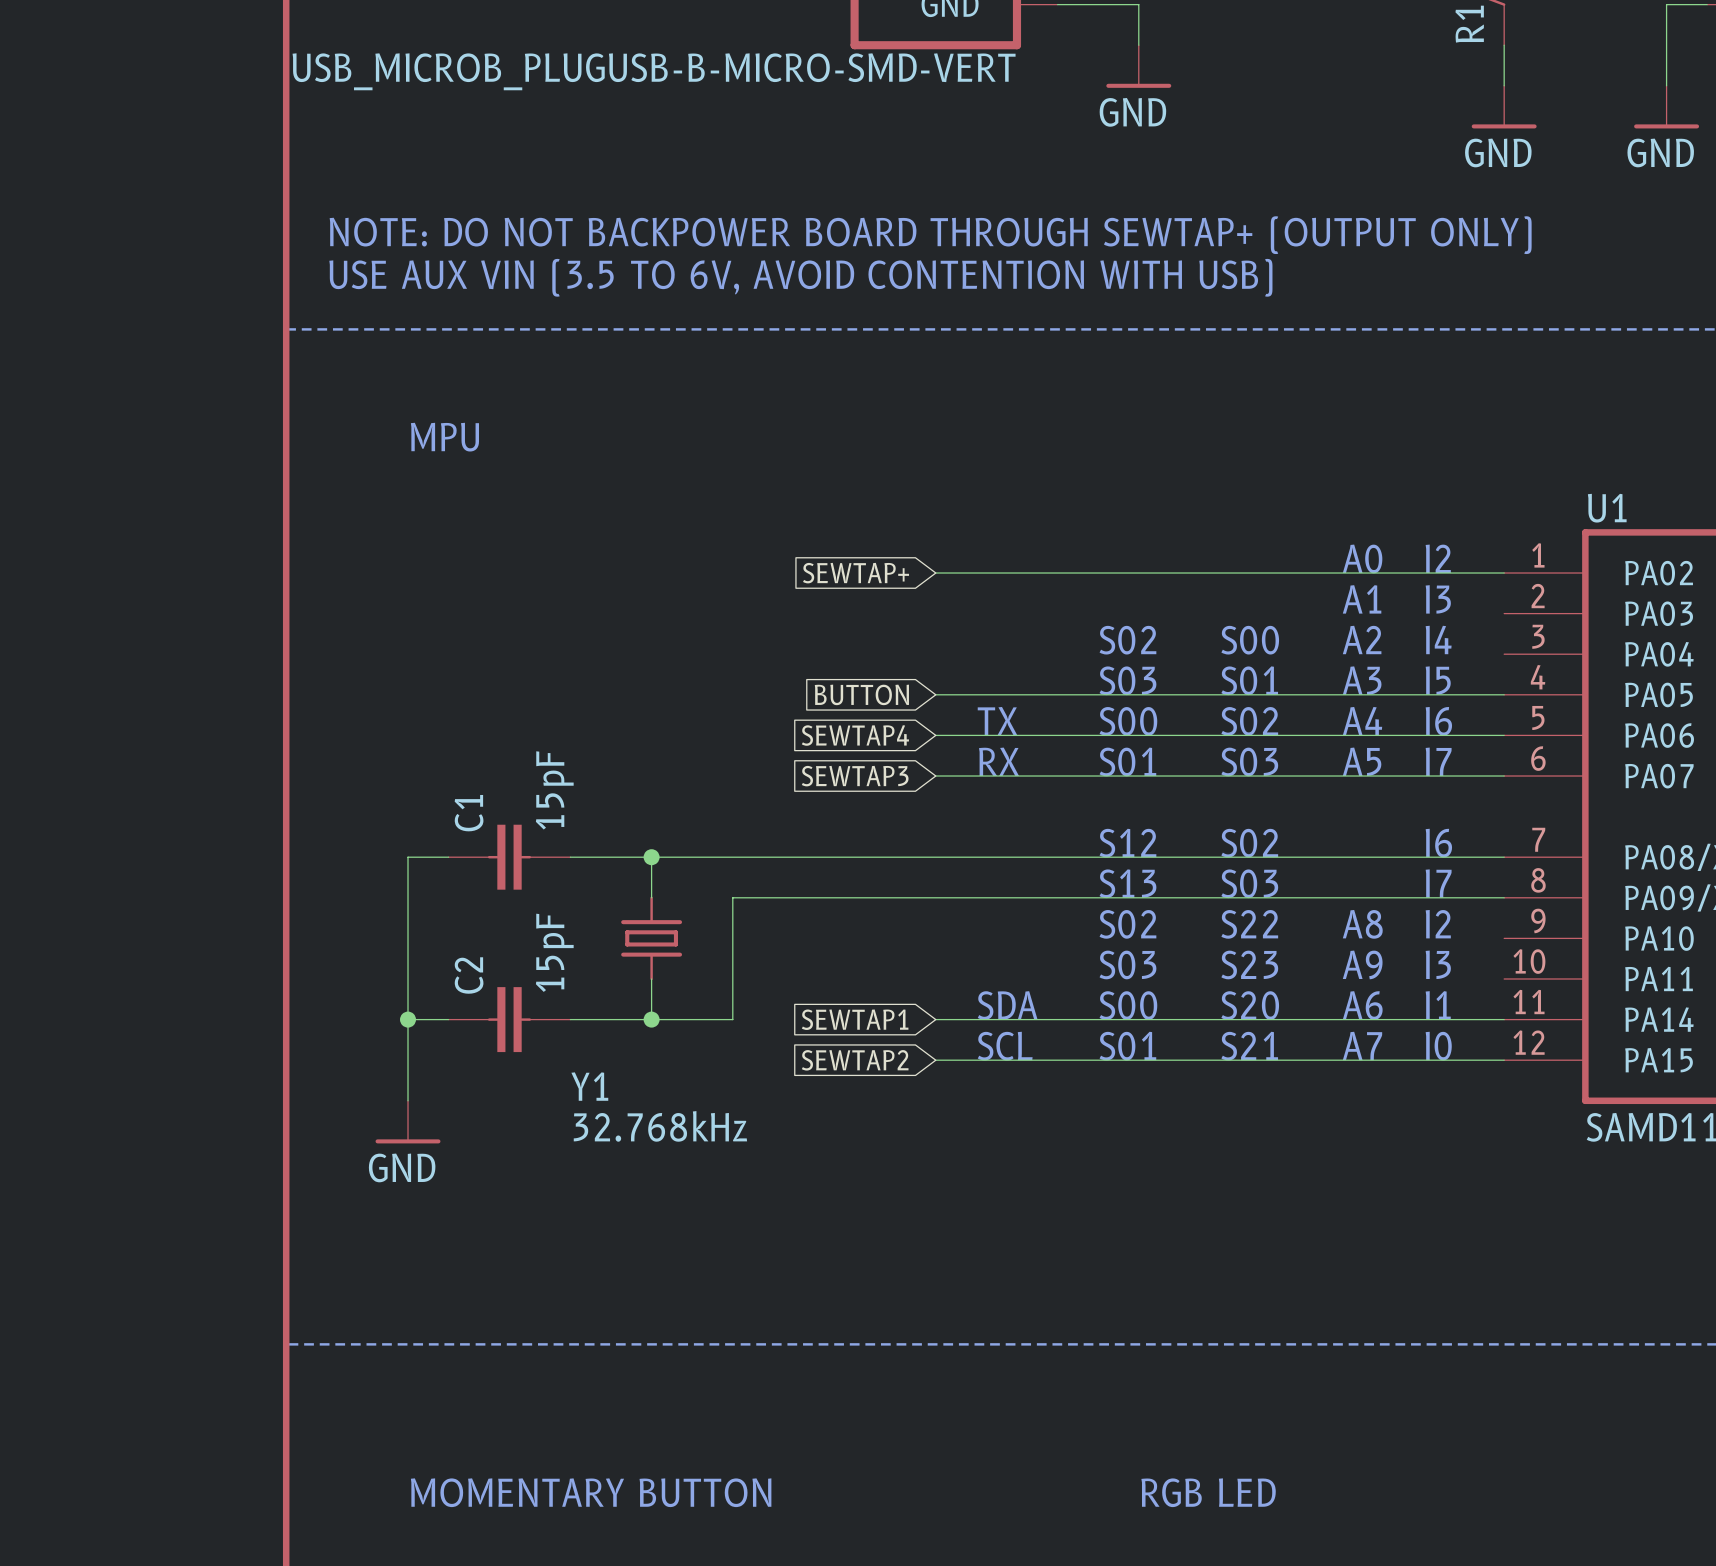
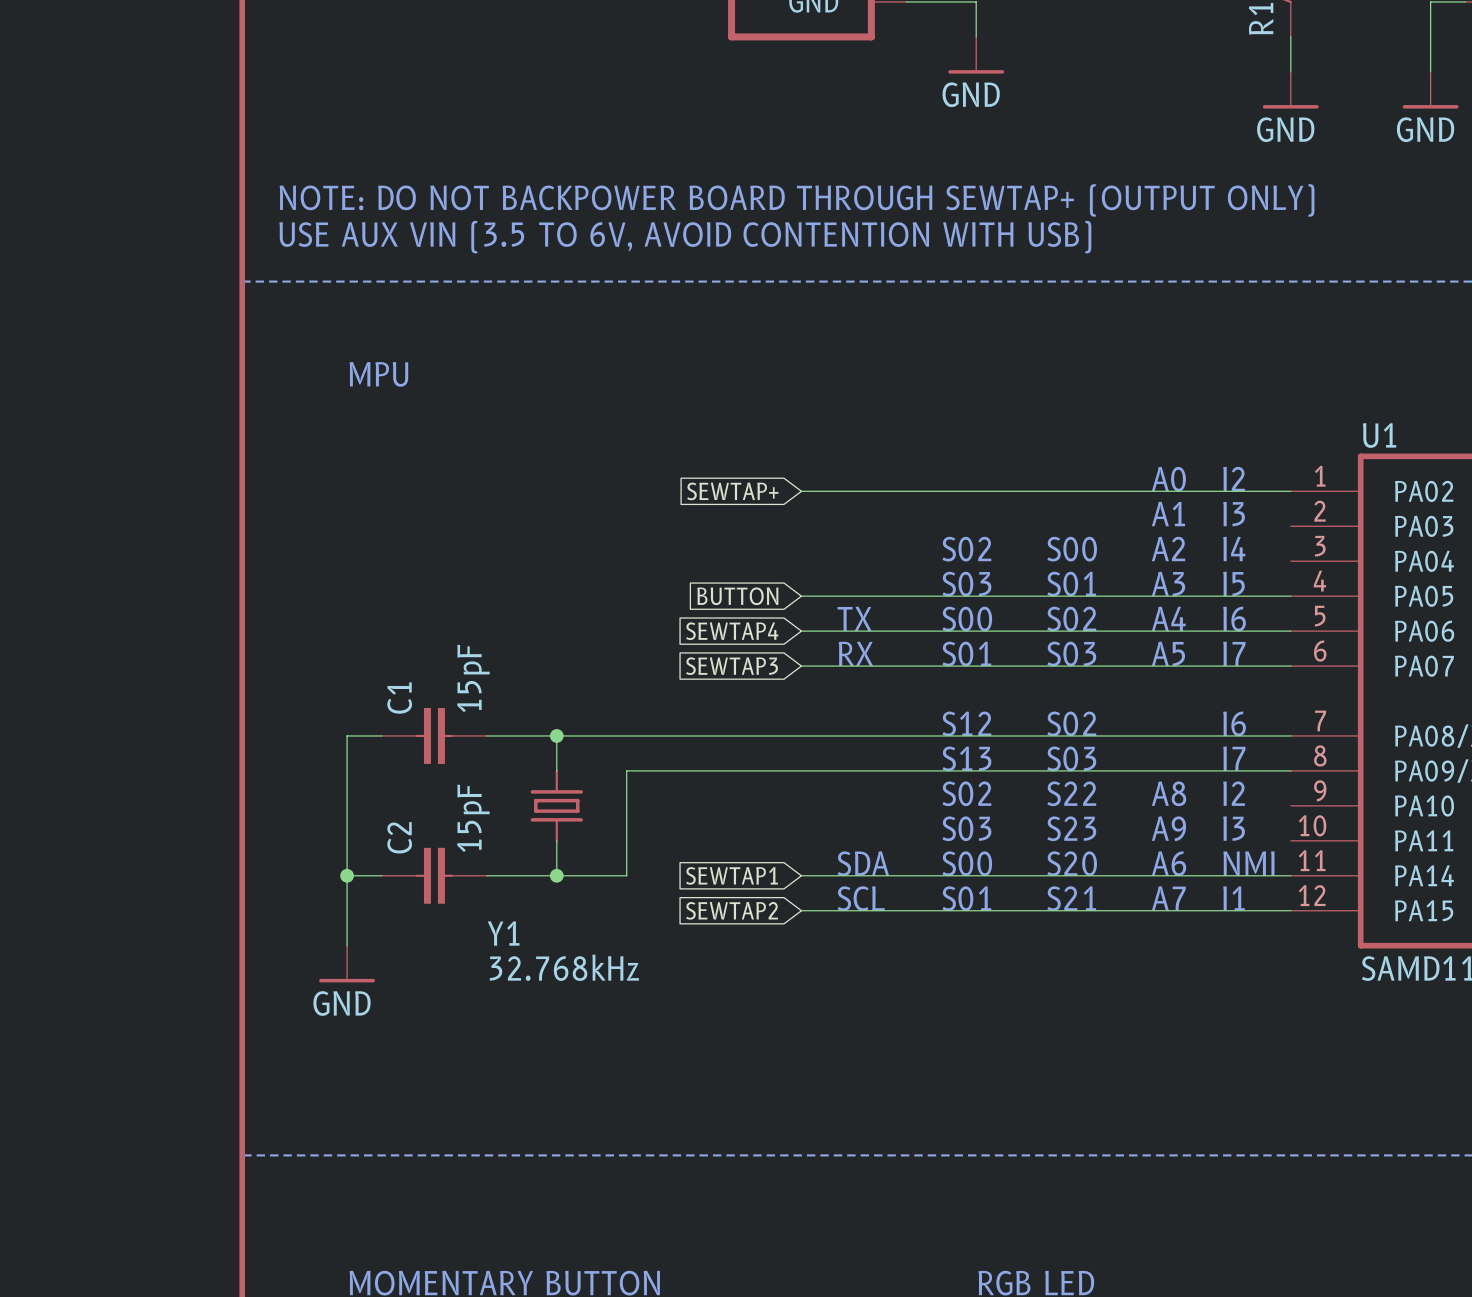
part value: USB_MICROB_PLUGUSB-B-MICRO-SMD-VERT (654, 71) -> none
text: I1 (1438, 1005) -> NMI (1248, 863)
text: I0 (1438, 1046) -> I1 (1234, 898)

